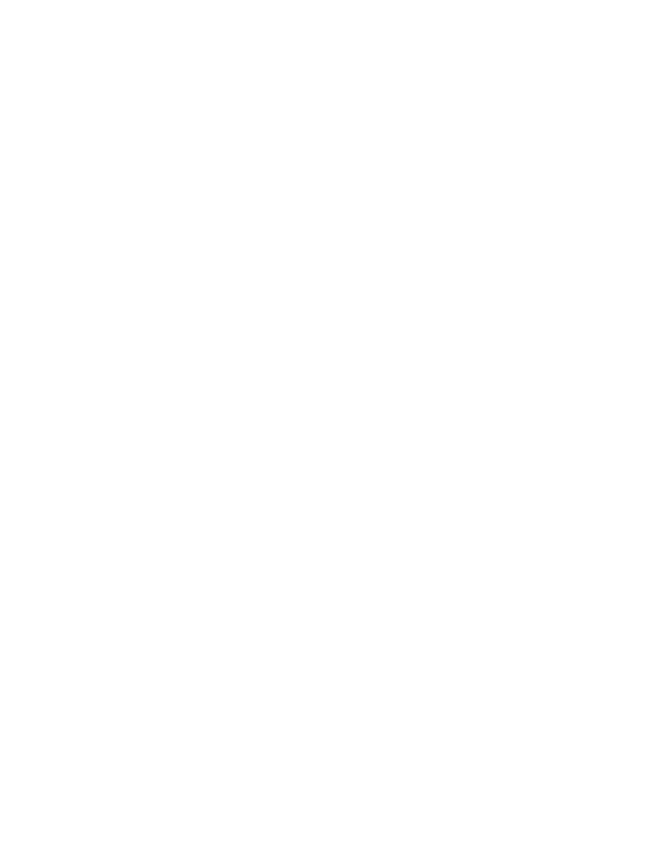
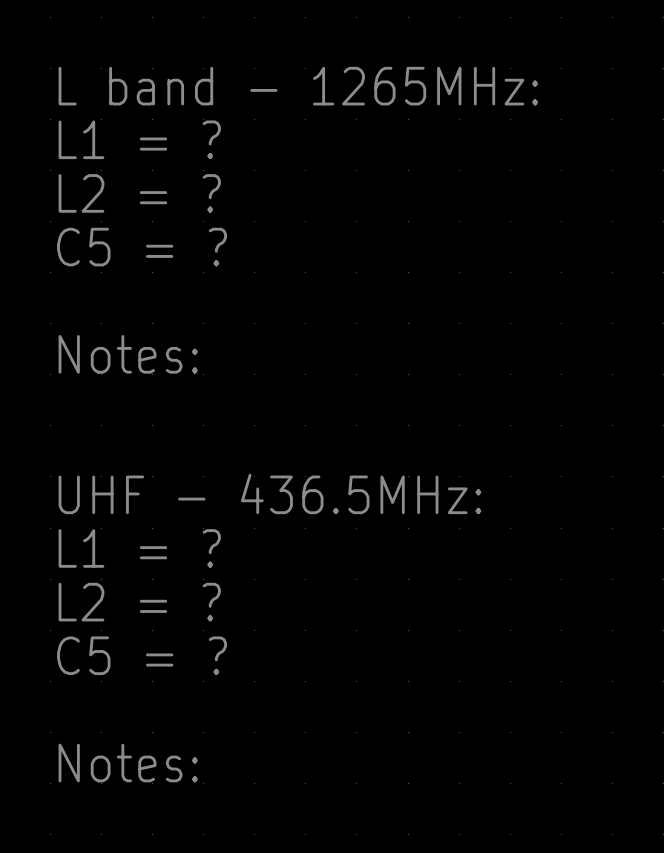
text: none -> L band - 1265MHz: (298, 86)
text: none -> L1 = ? (139, 139)
text: none -> L2 = ? (139, 193)
text: none -> C5 = ? (142, 247)
text: none -> Notes: (128, 354)
text: none -> UHF - 436.5MHz: (269, 493)
text: none -> L1 = ? (139, 548)
text: none -> L2 = ? (139, 602)
text: none -> C5 = ? (142, 655)
text: none -> Notes: (128, 763)

